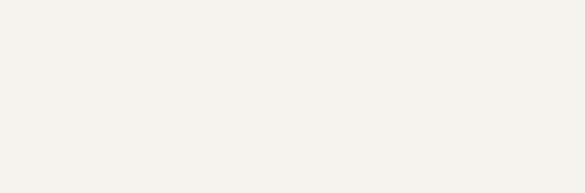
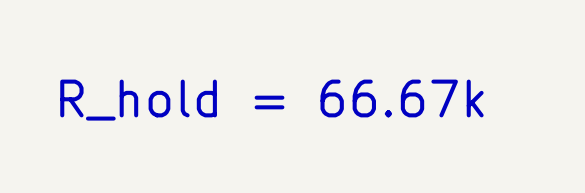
text: none -> R_hold = 66.67k (271, 100)

